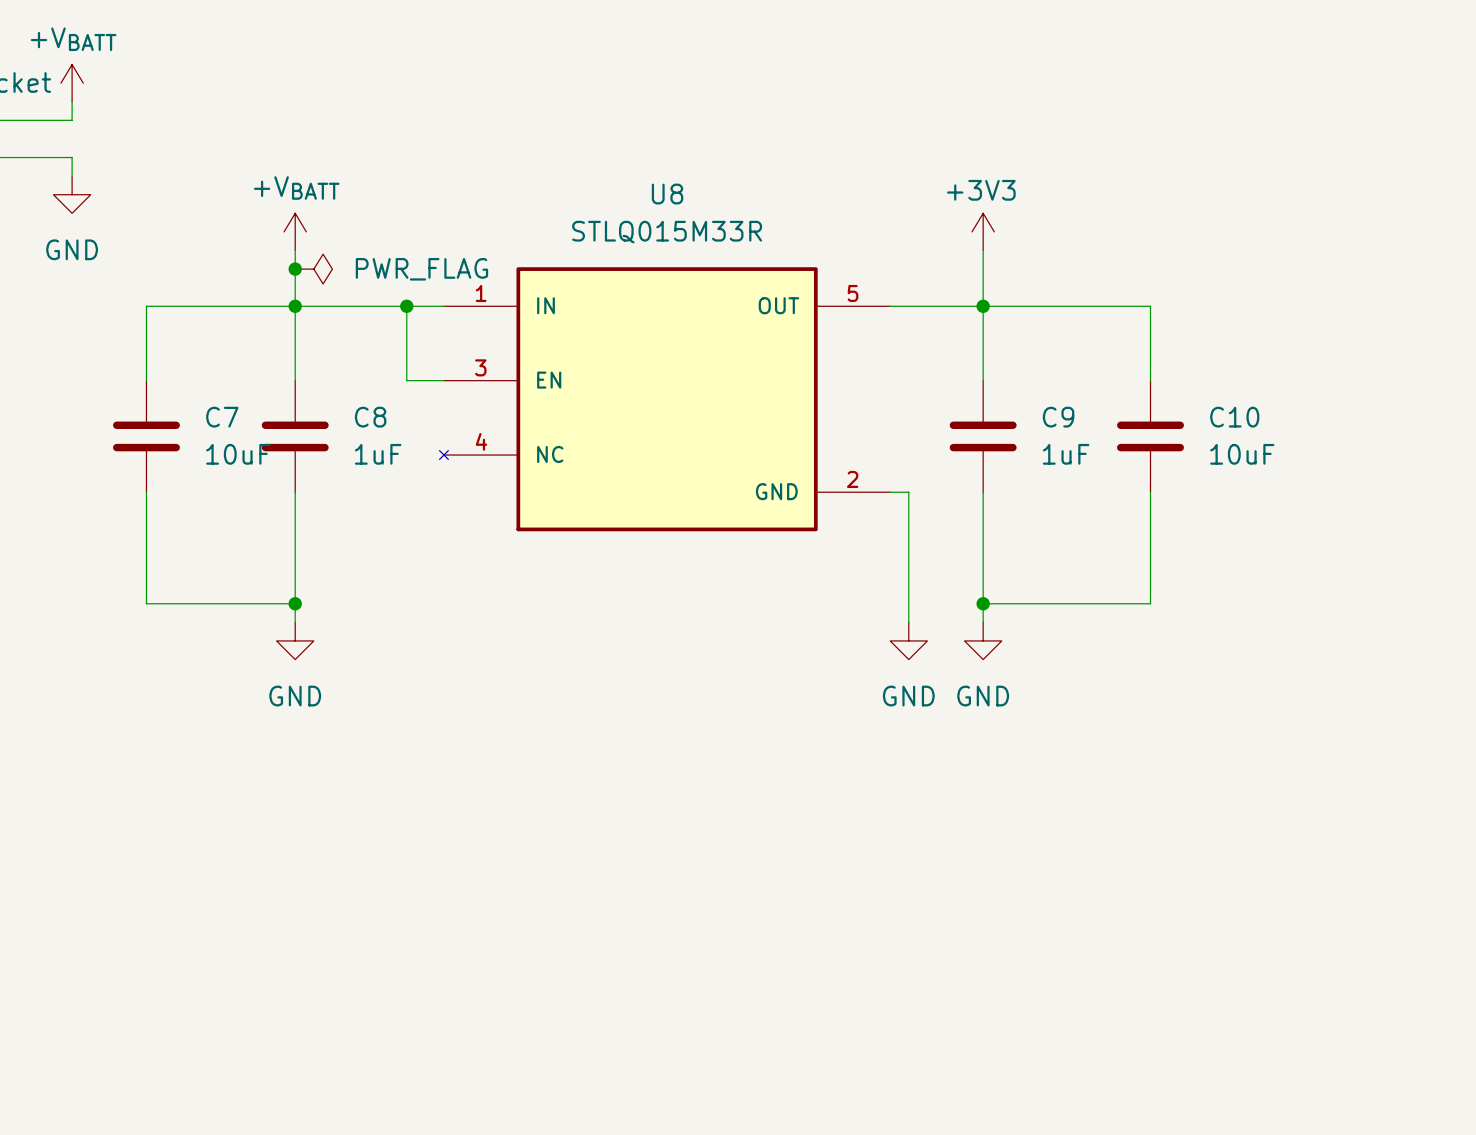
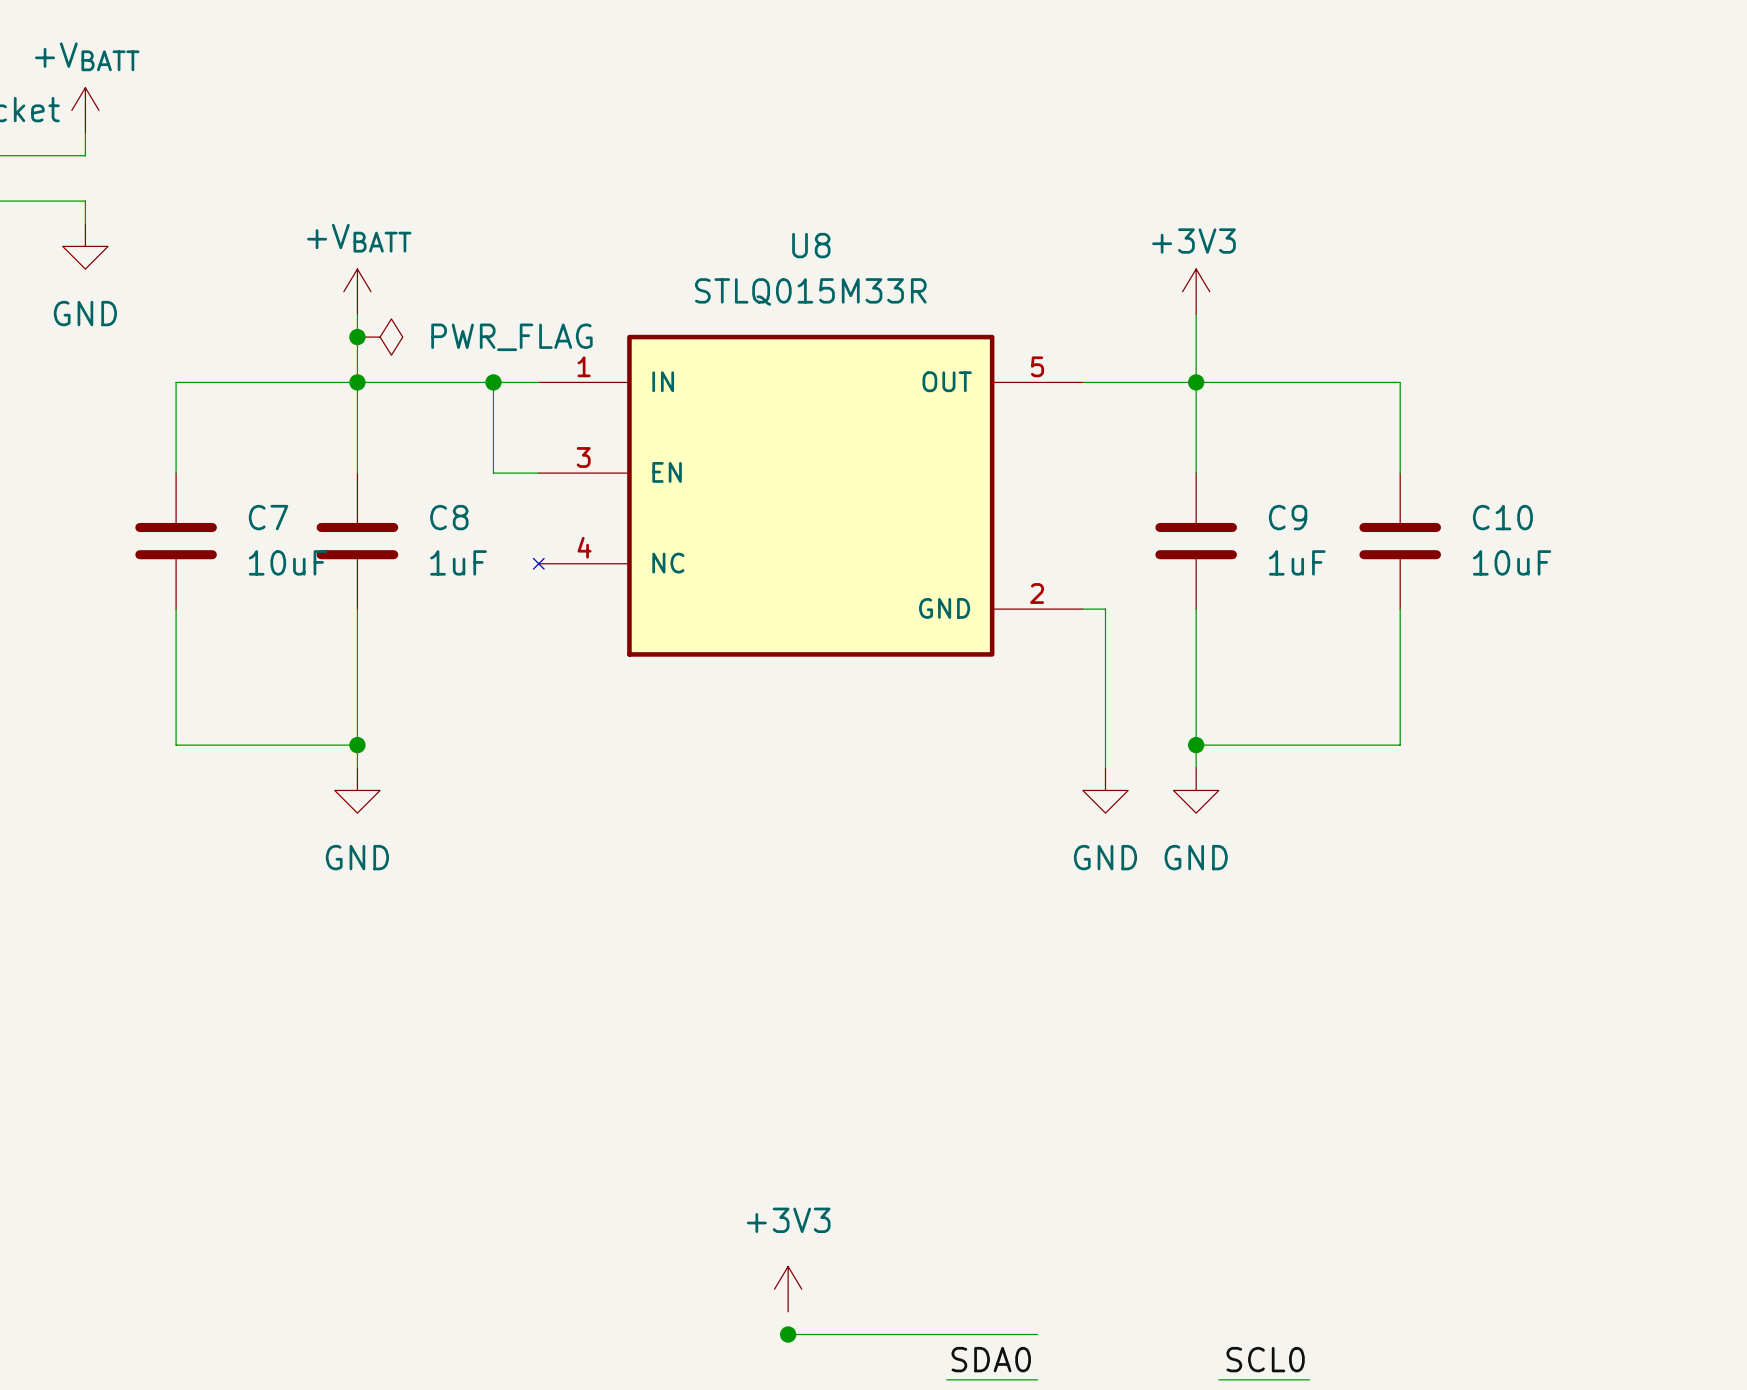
power symbol: none -> +3V3 (788, 1289)
wire: none -> (788, 1334) (1037, 1334)
junction: none -> (788, 1334)
label: none -> SDA0 (991, 1359)
label: none -> SCL0 (1265, 1359)
wire: none -> (946, 1379) (1037, 1379)
wire: none -> (1218, 1379) (1309, 1379)

